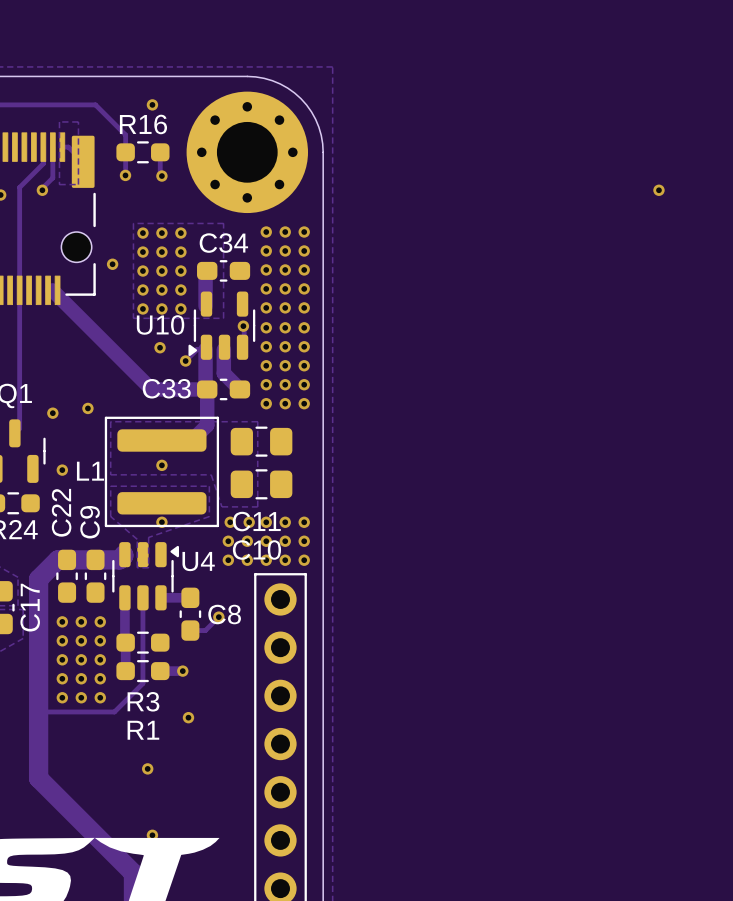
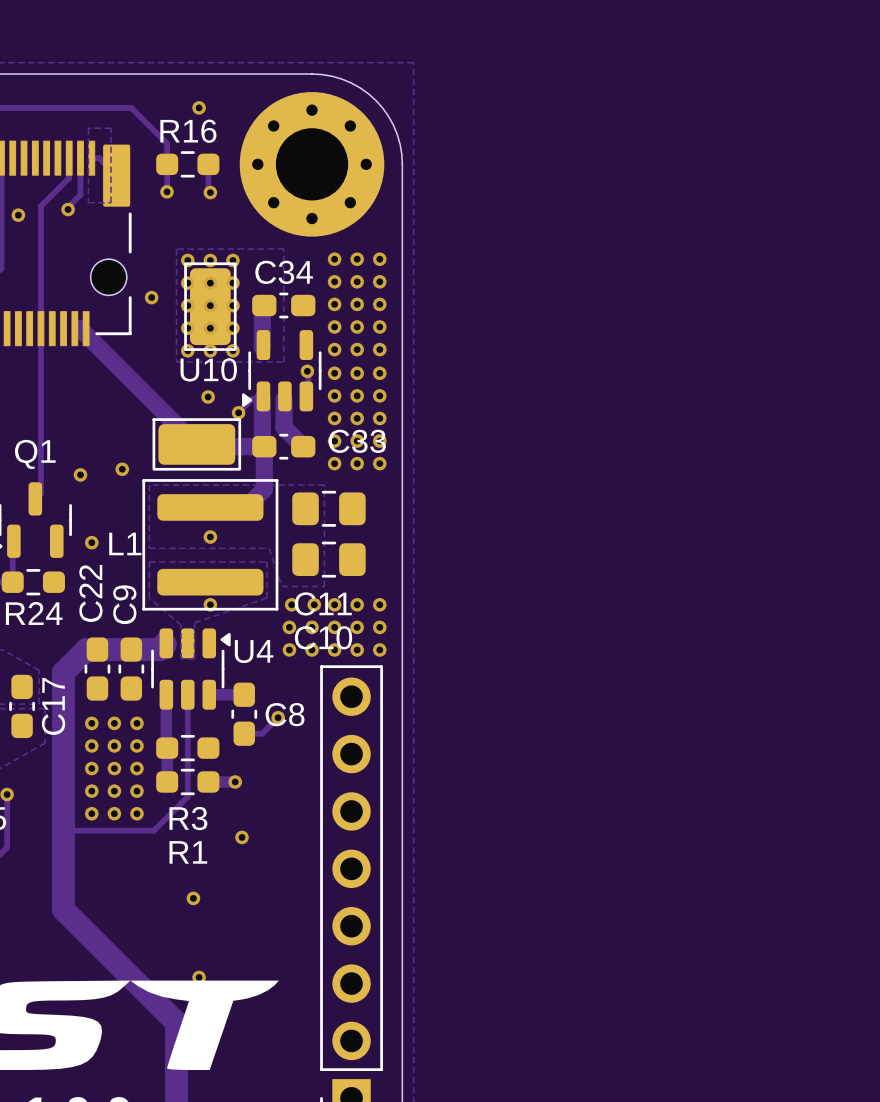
via: (658, 190) -> none
part: none -> (210, 306)
part: none -> (196, 444)
C33 name position: C33 (166, 388) -> C33 (357, 441)

